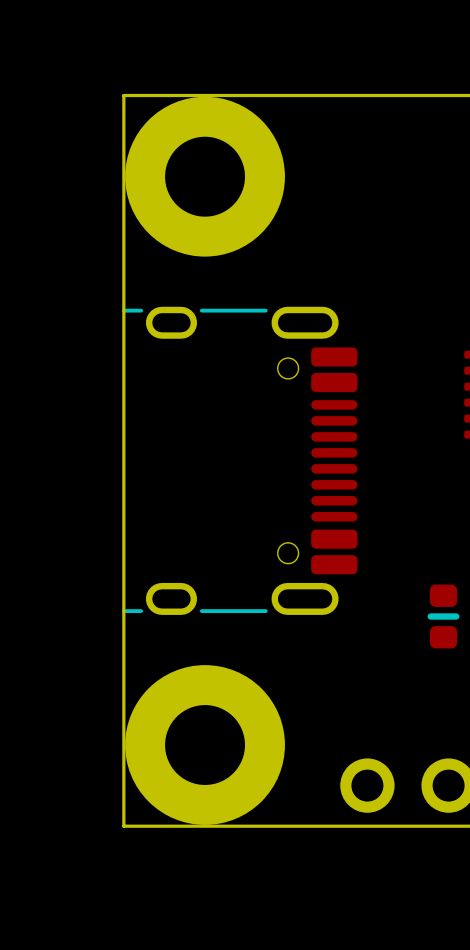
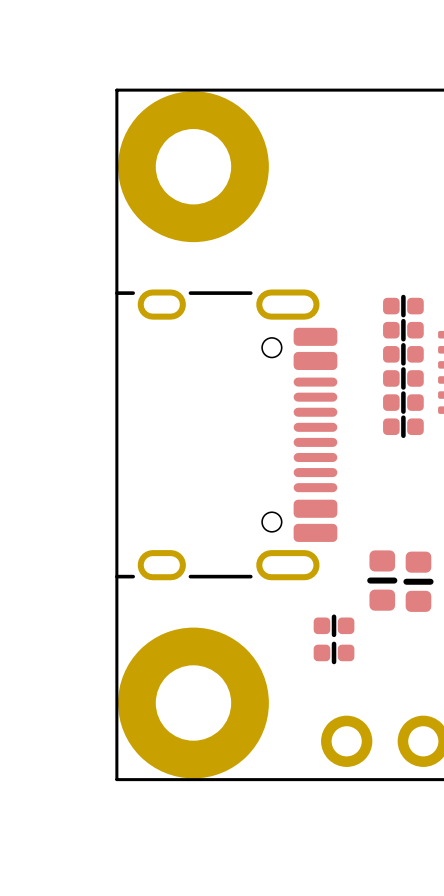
part: none -> (403, 306)
part: none -> (403, 330)
part: none -> (403, 354)
part: none -> (403, 378)
part: none -> (403, 402)
part: none -> (403, 426)
part: none -> (382, 580)
part: none -> (334, 625)
part: none -> (334, 652)

